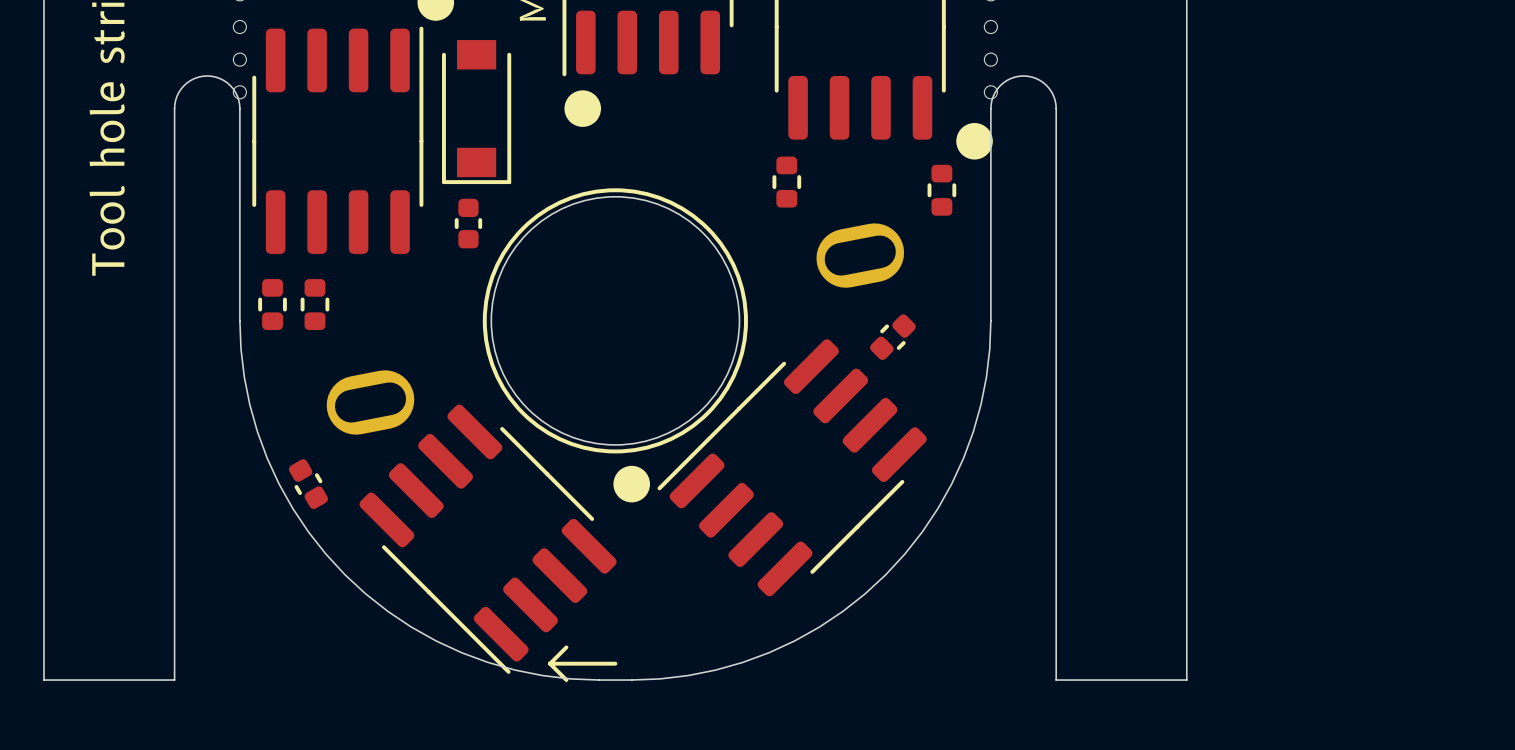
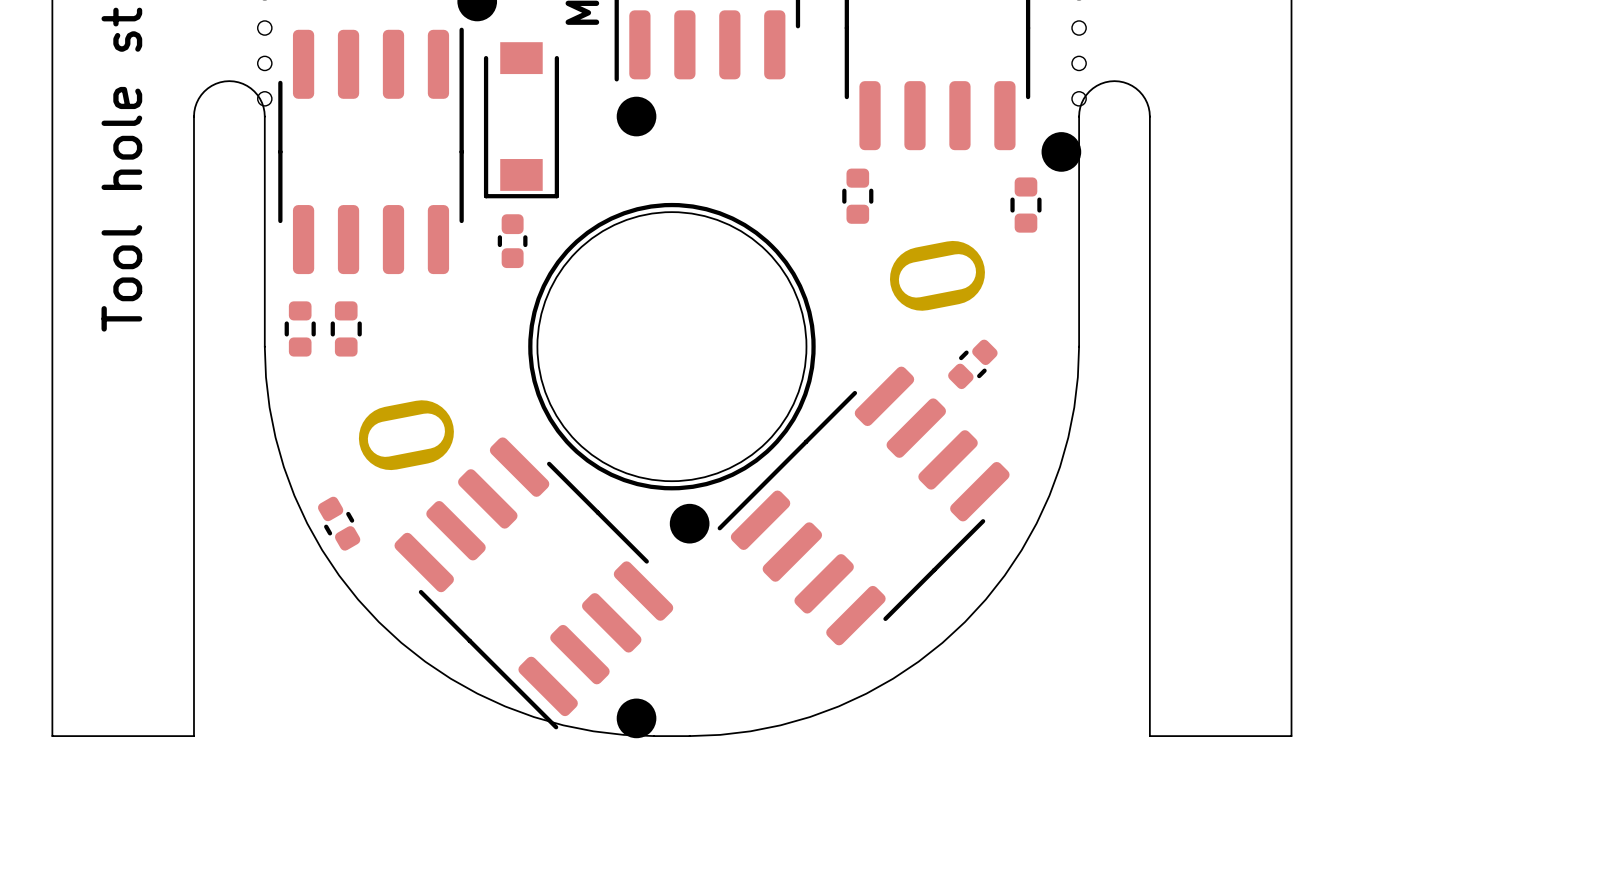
drawing: none -> [616, 698, 657, 739]
line: (566, 647) (550, 663) -> none
line: (550, 663) (566, 680) -> none
line: (550, 663) (615, 663) -> none

